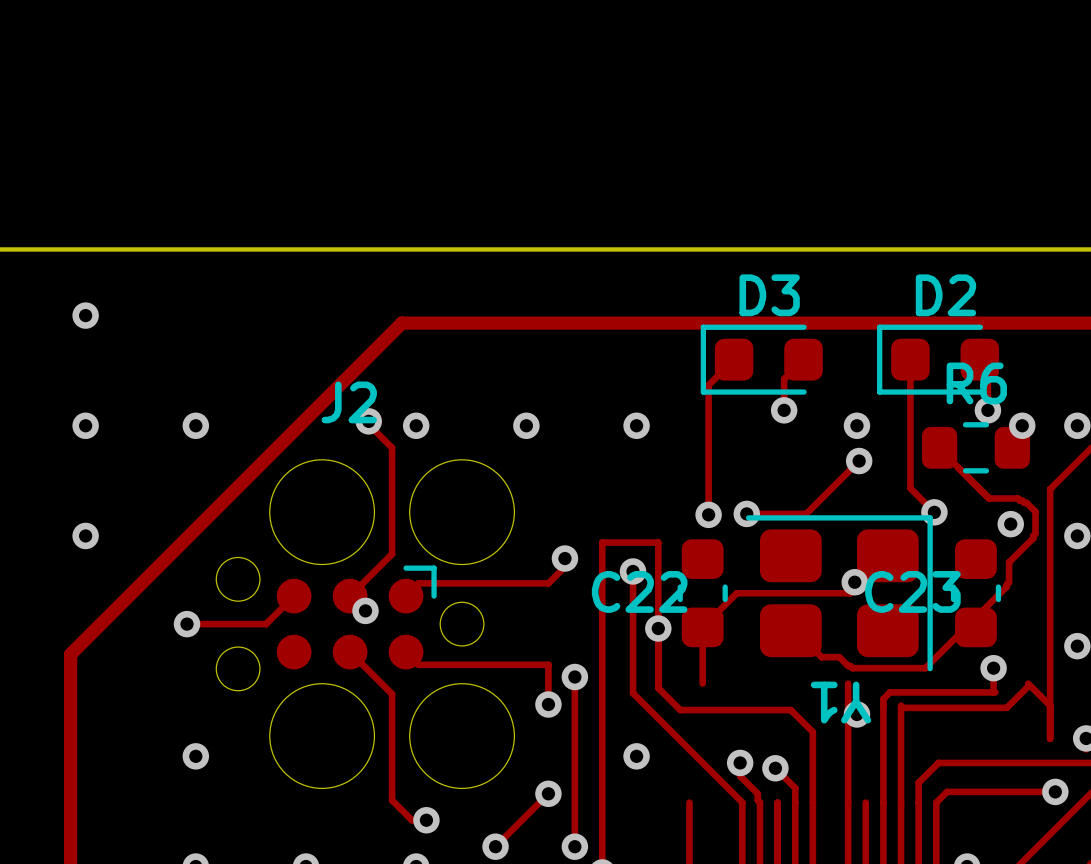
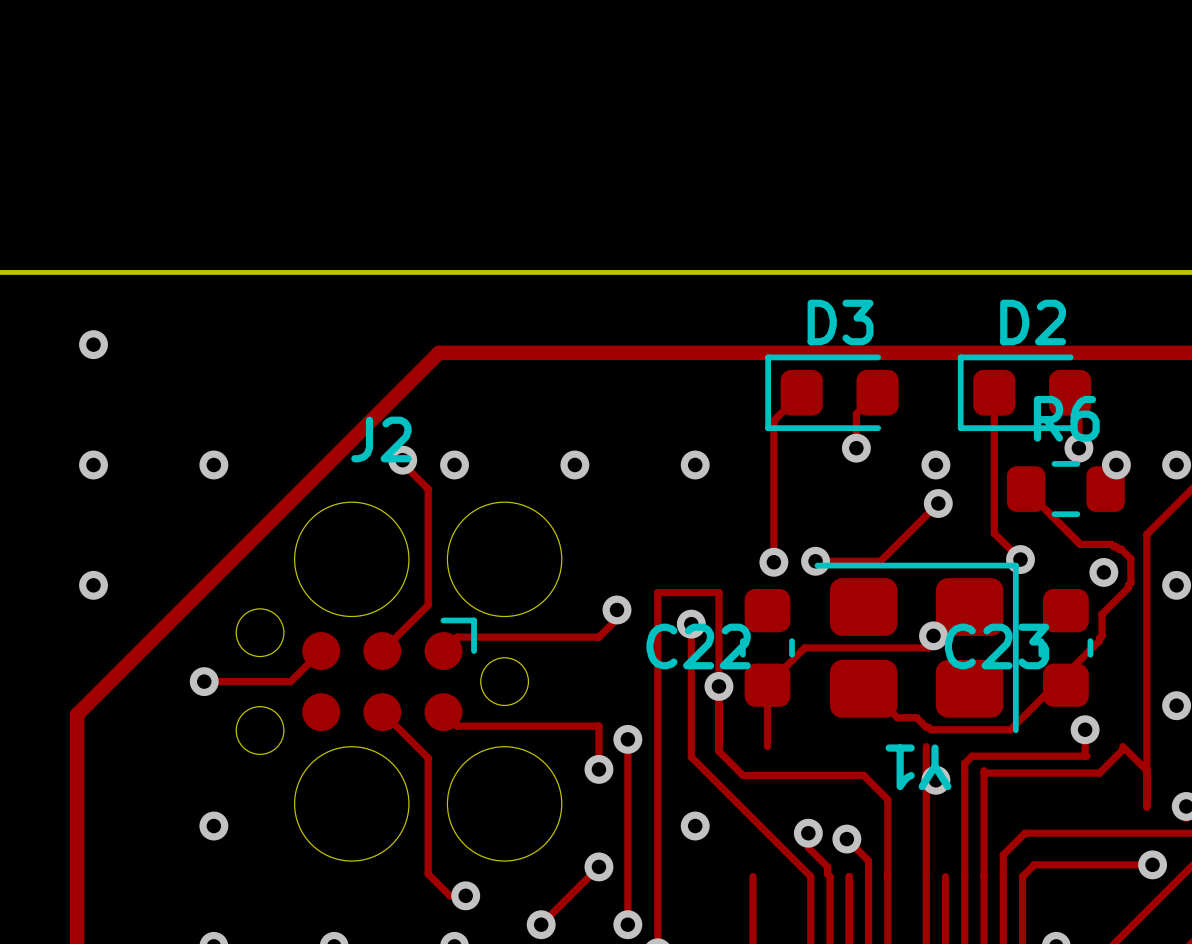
via: (365, 610) -> none

